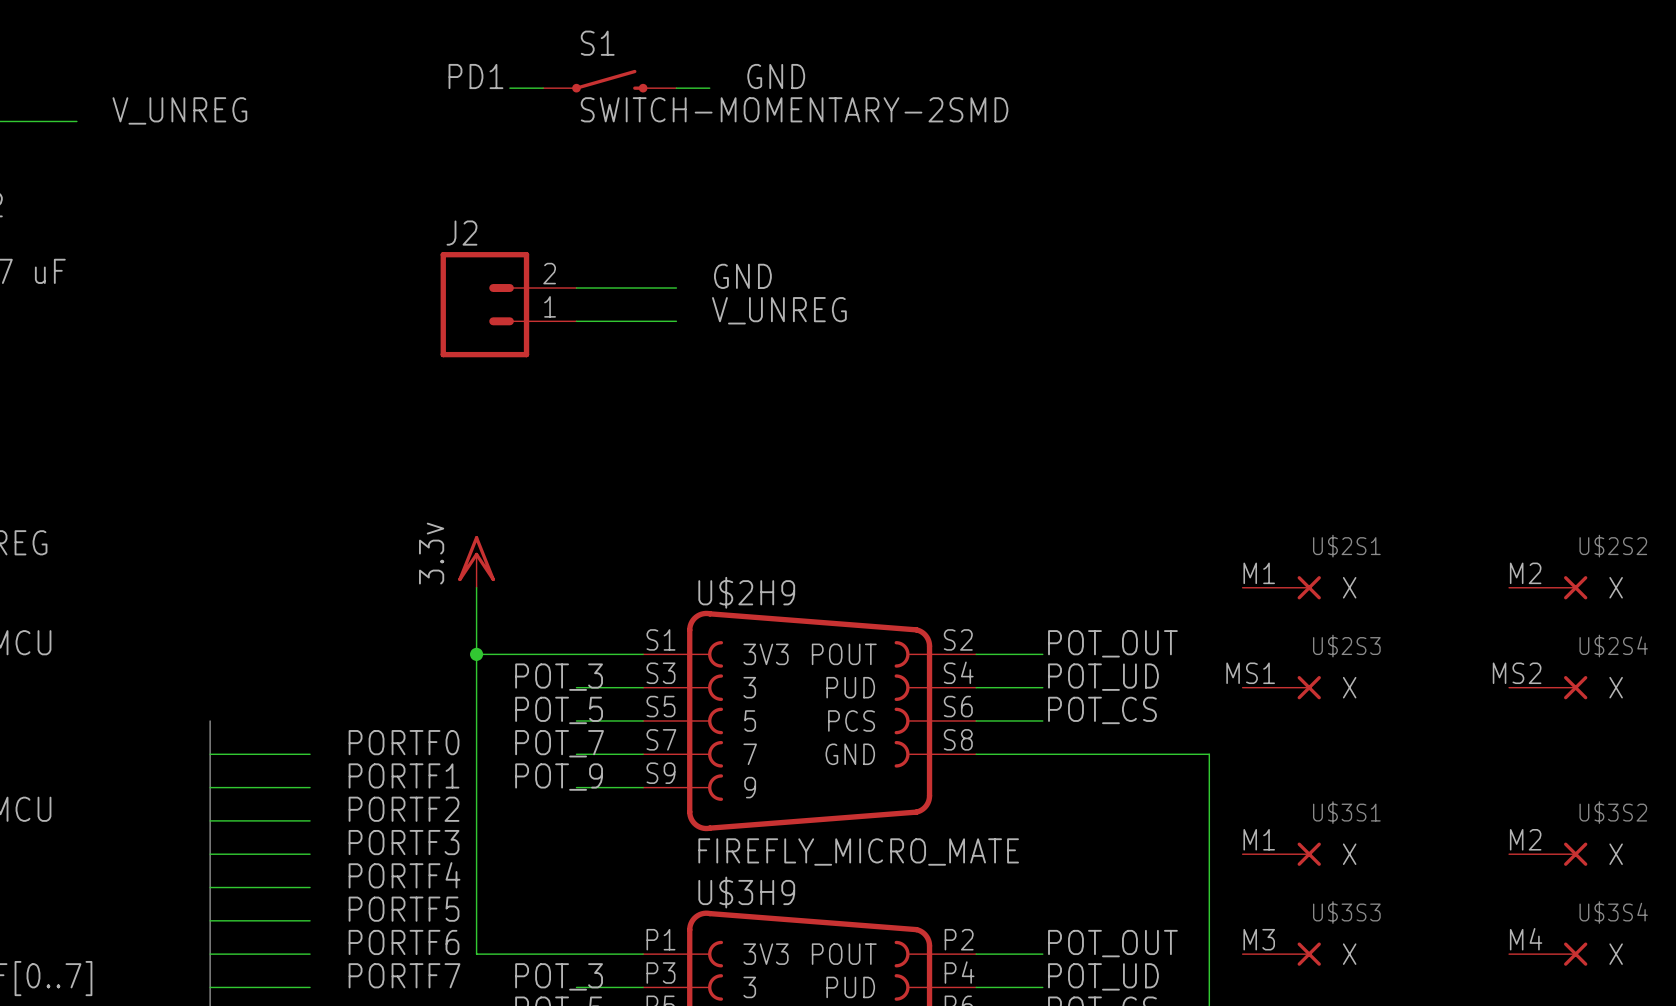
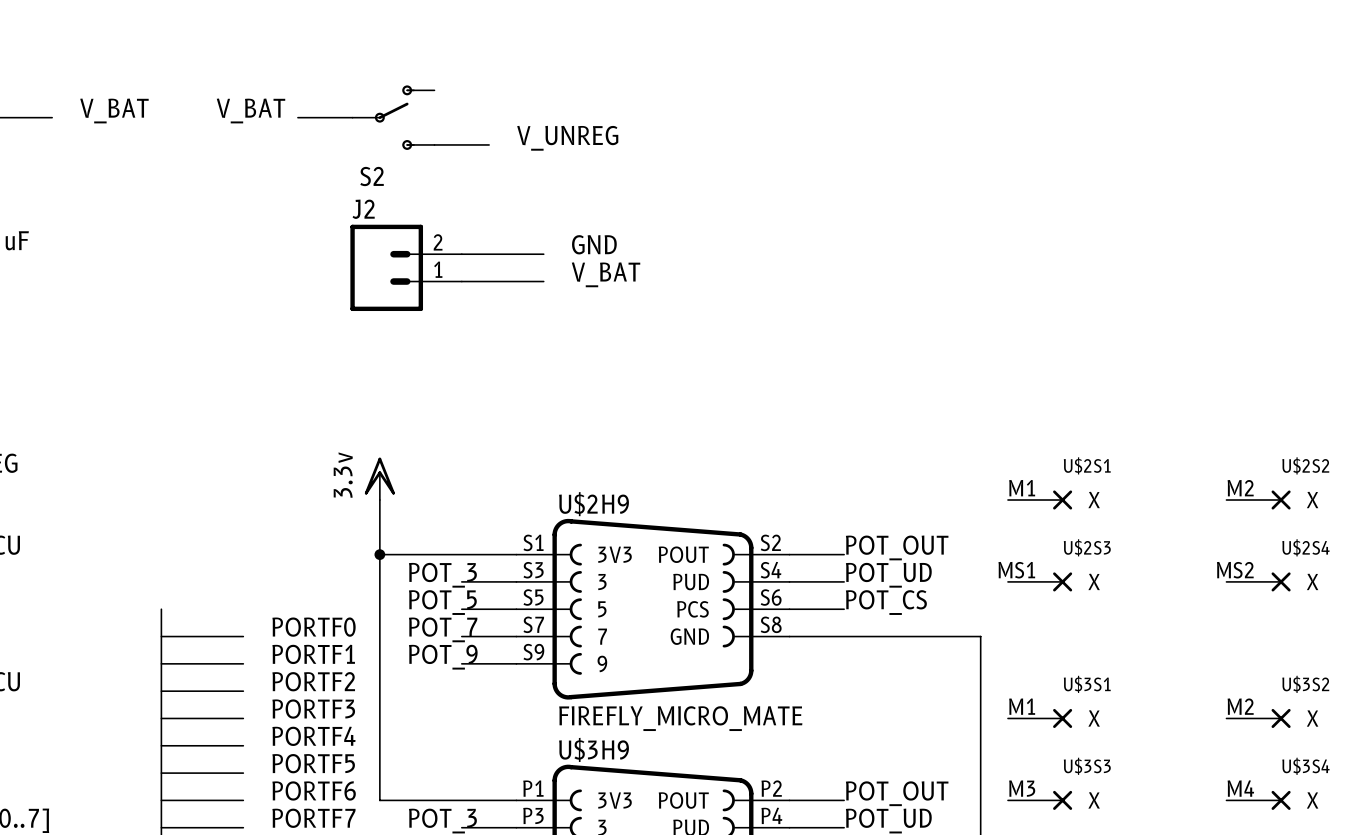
label: PD1 (475, 76) -> none
label: GND (776, 76) -> none
S1: SWITCH-MOMENTARY-2SMD (609, 81) -> none
wire: (676, 88) (709, 88) -> none
label: V_UNREG (179, 110) -> V_BAT (114, 110)
label: none -> V_BAT (251, 110)
wire: none -> (297, 117) (352, 117)
S2: none -> (393, 117)
label: none -> V_UNREG (567, 138)
wire: none -> (434, 144) (489, 144)
label: V_UNREG (779, 310) -> V_BAT (606, 274)

